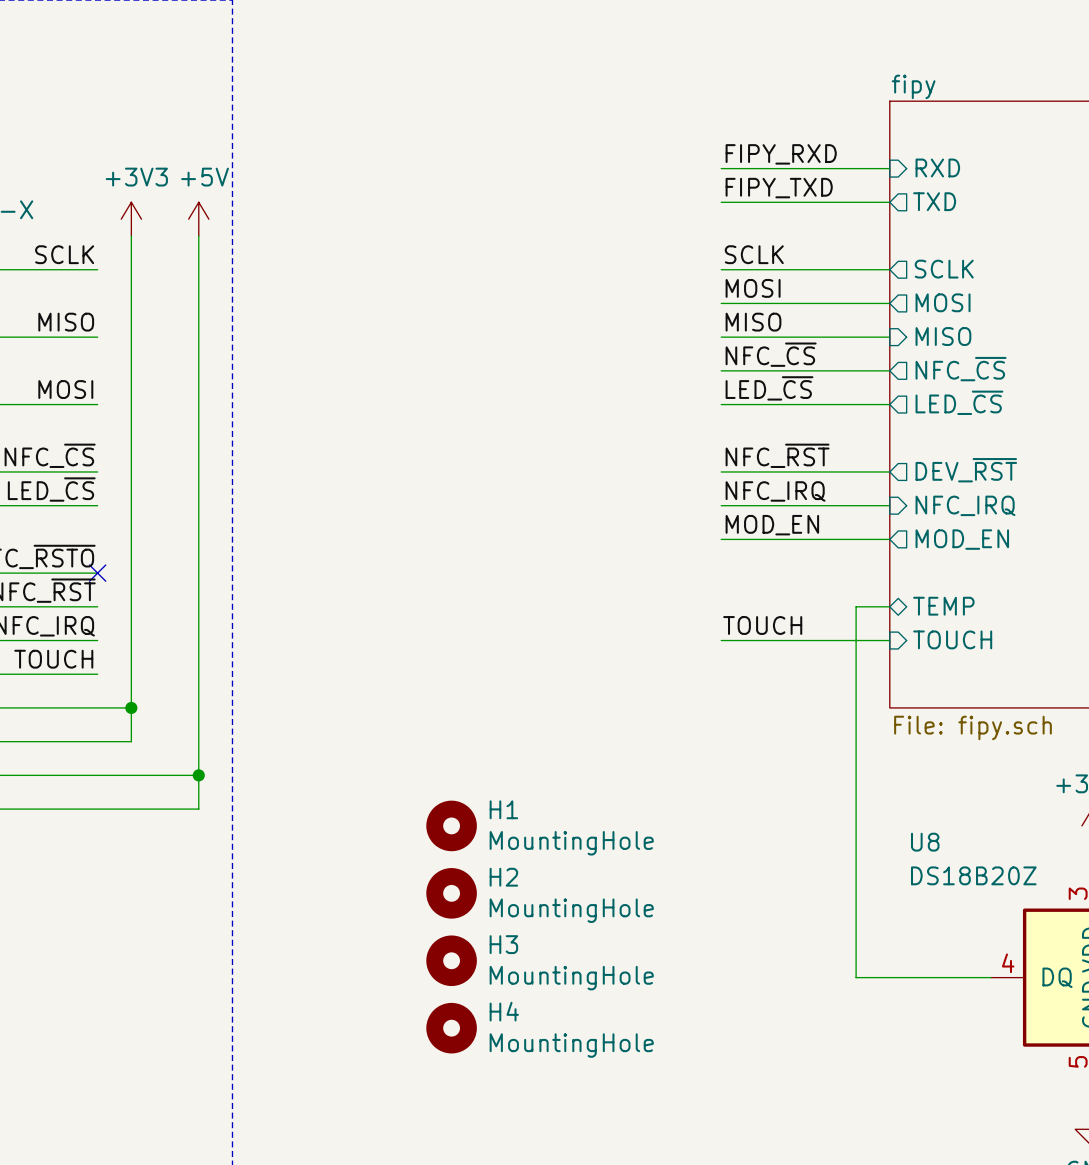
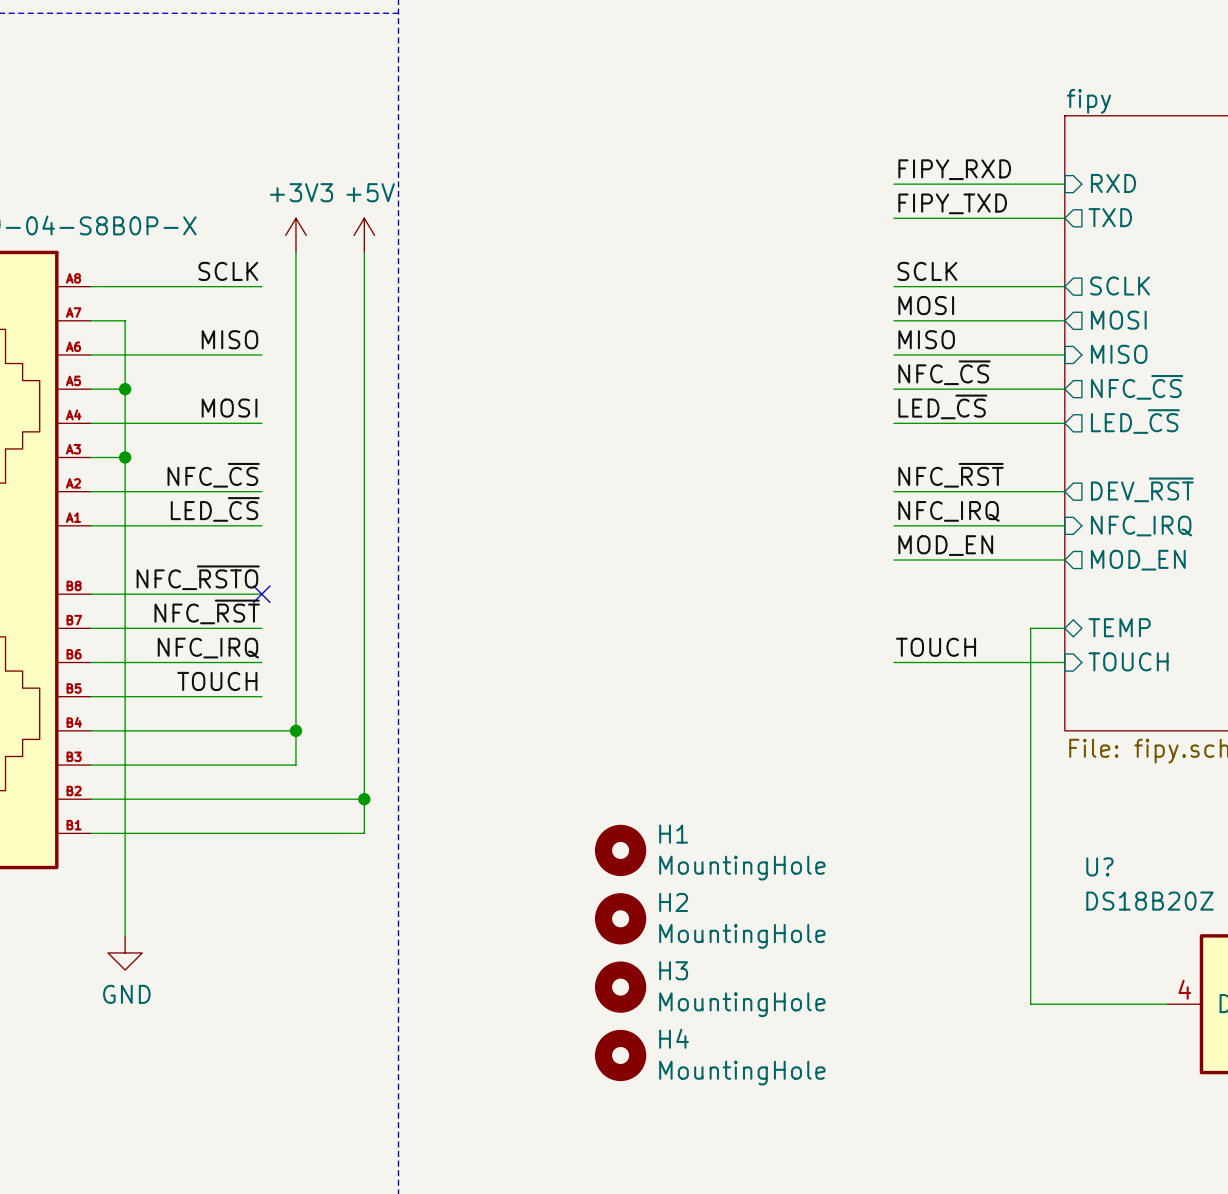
U8 name: U8 (925, 842) -> U? (1099, 866)

